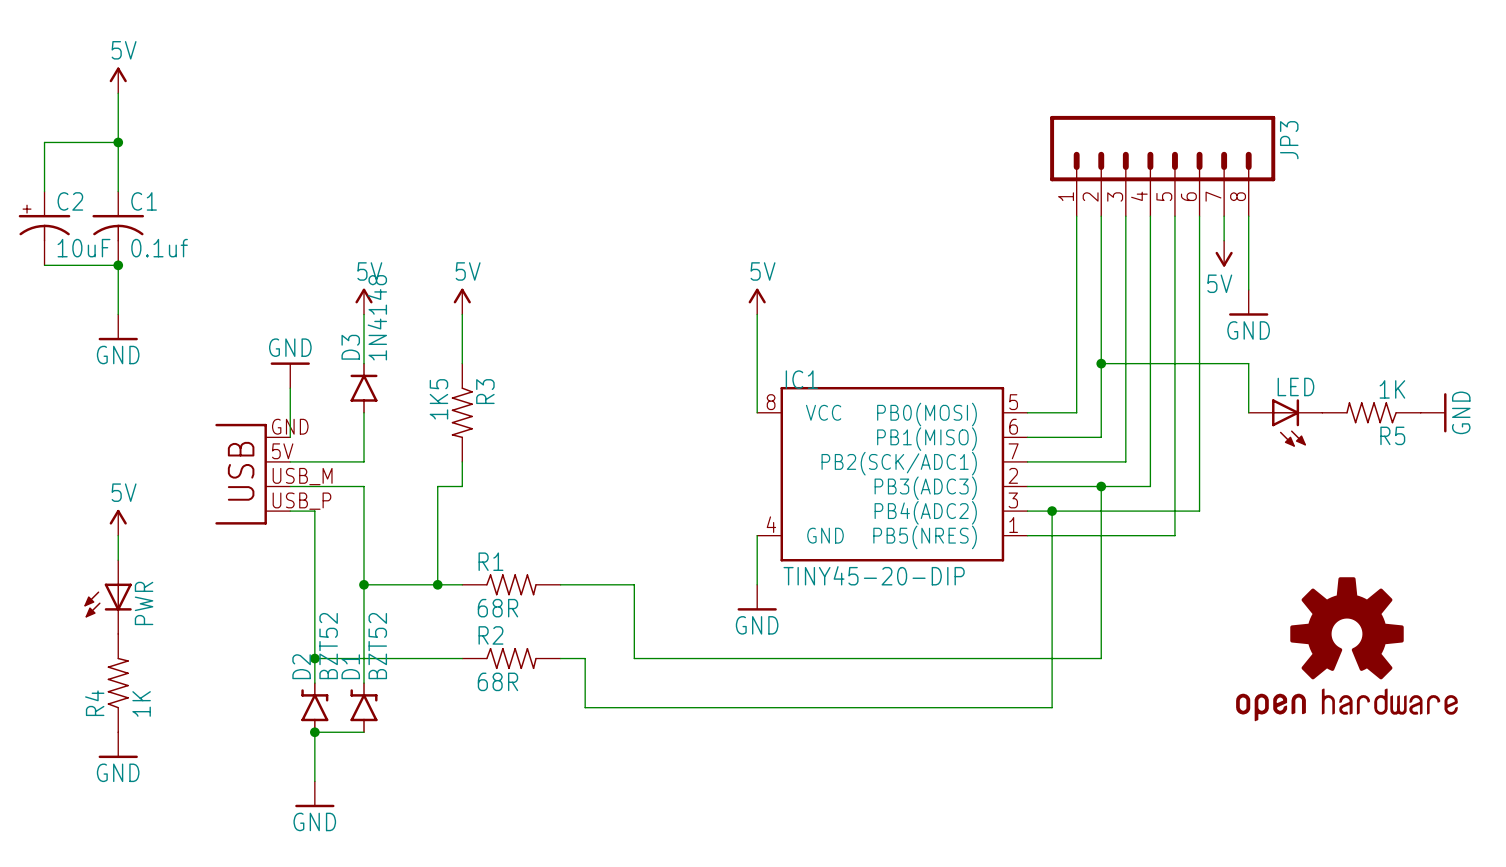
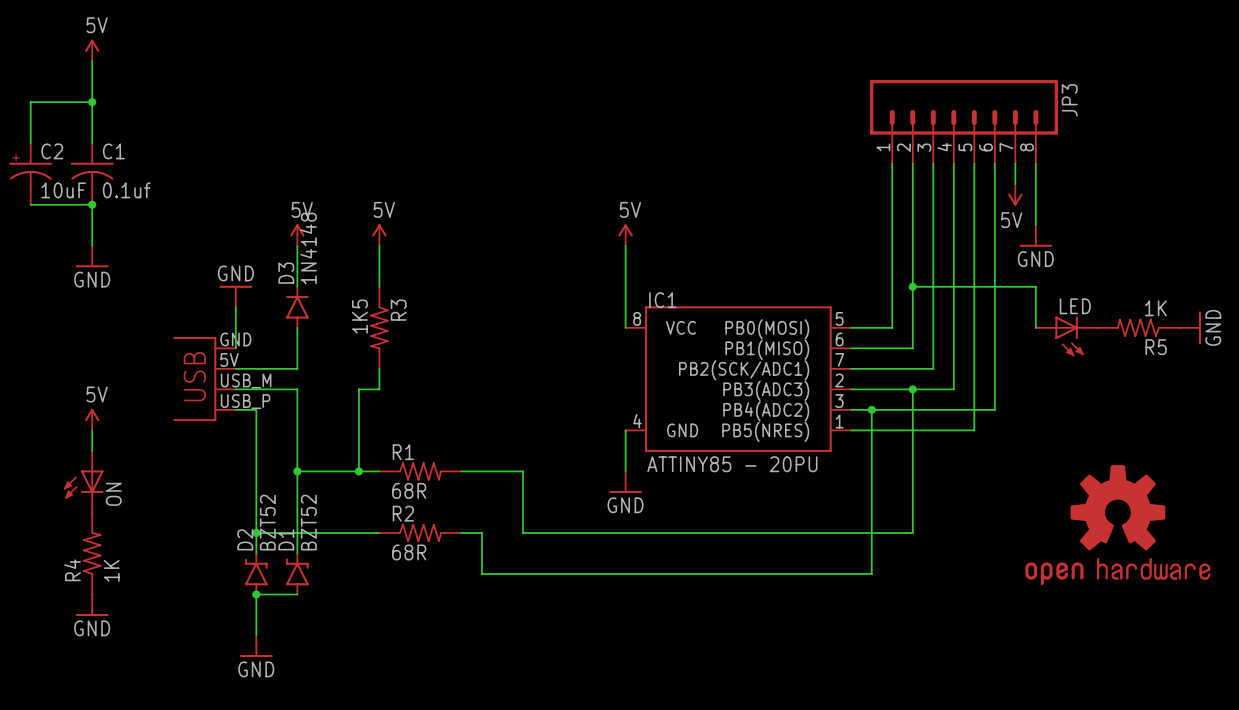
IC1 value: TINY45-20-DIP (874, 575) -> ATTINY85 - 20PU (732, 464)
PWR name: PWR (144, 603) -> ON (113, 494)

